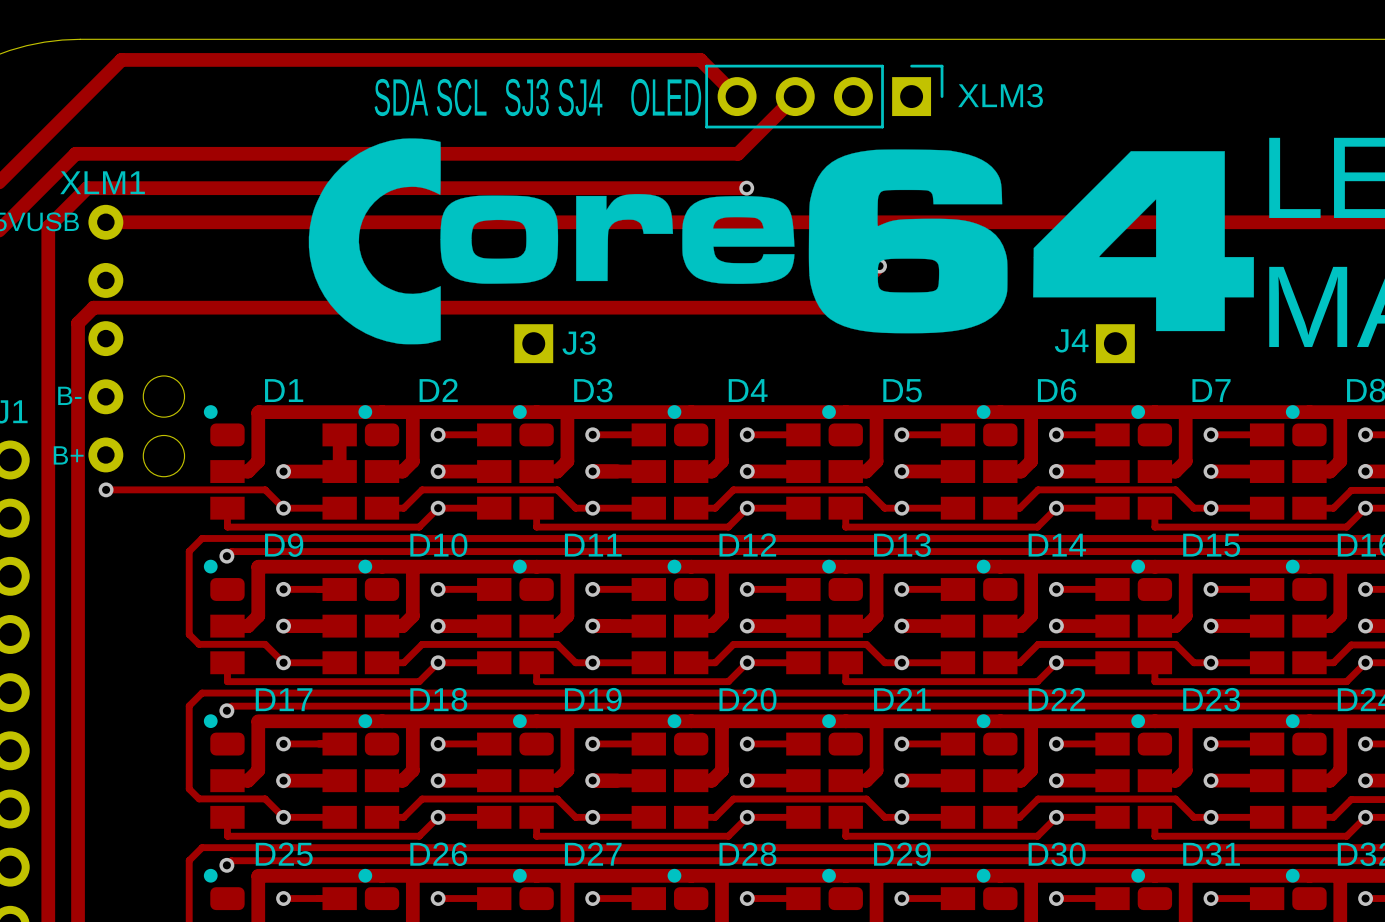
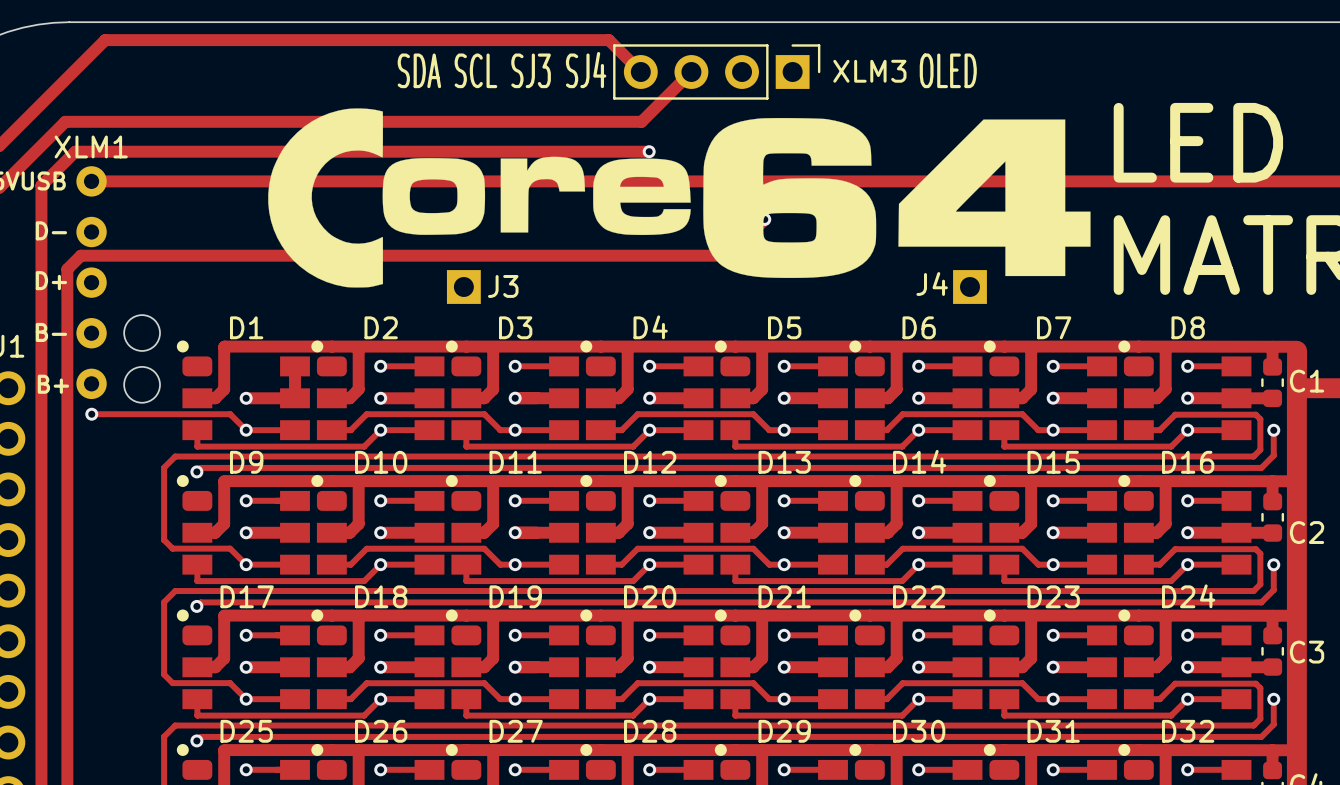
text position: SDA SCL (430, 97) -> SDA SCL (447, 70)
text position: SJ3 SJ4 (553, 97) -> SJ3 SJ4 (558, 70)
text position: OLED (666, 97) -> OLED (948, 70)
text: none -> D- (51, 230)
text: none -> D+ (51, 280)

